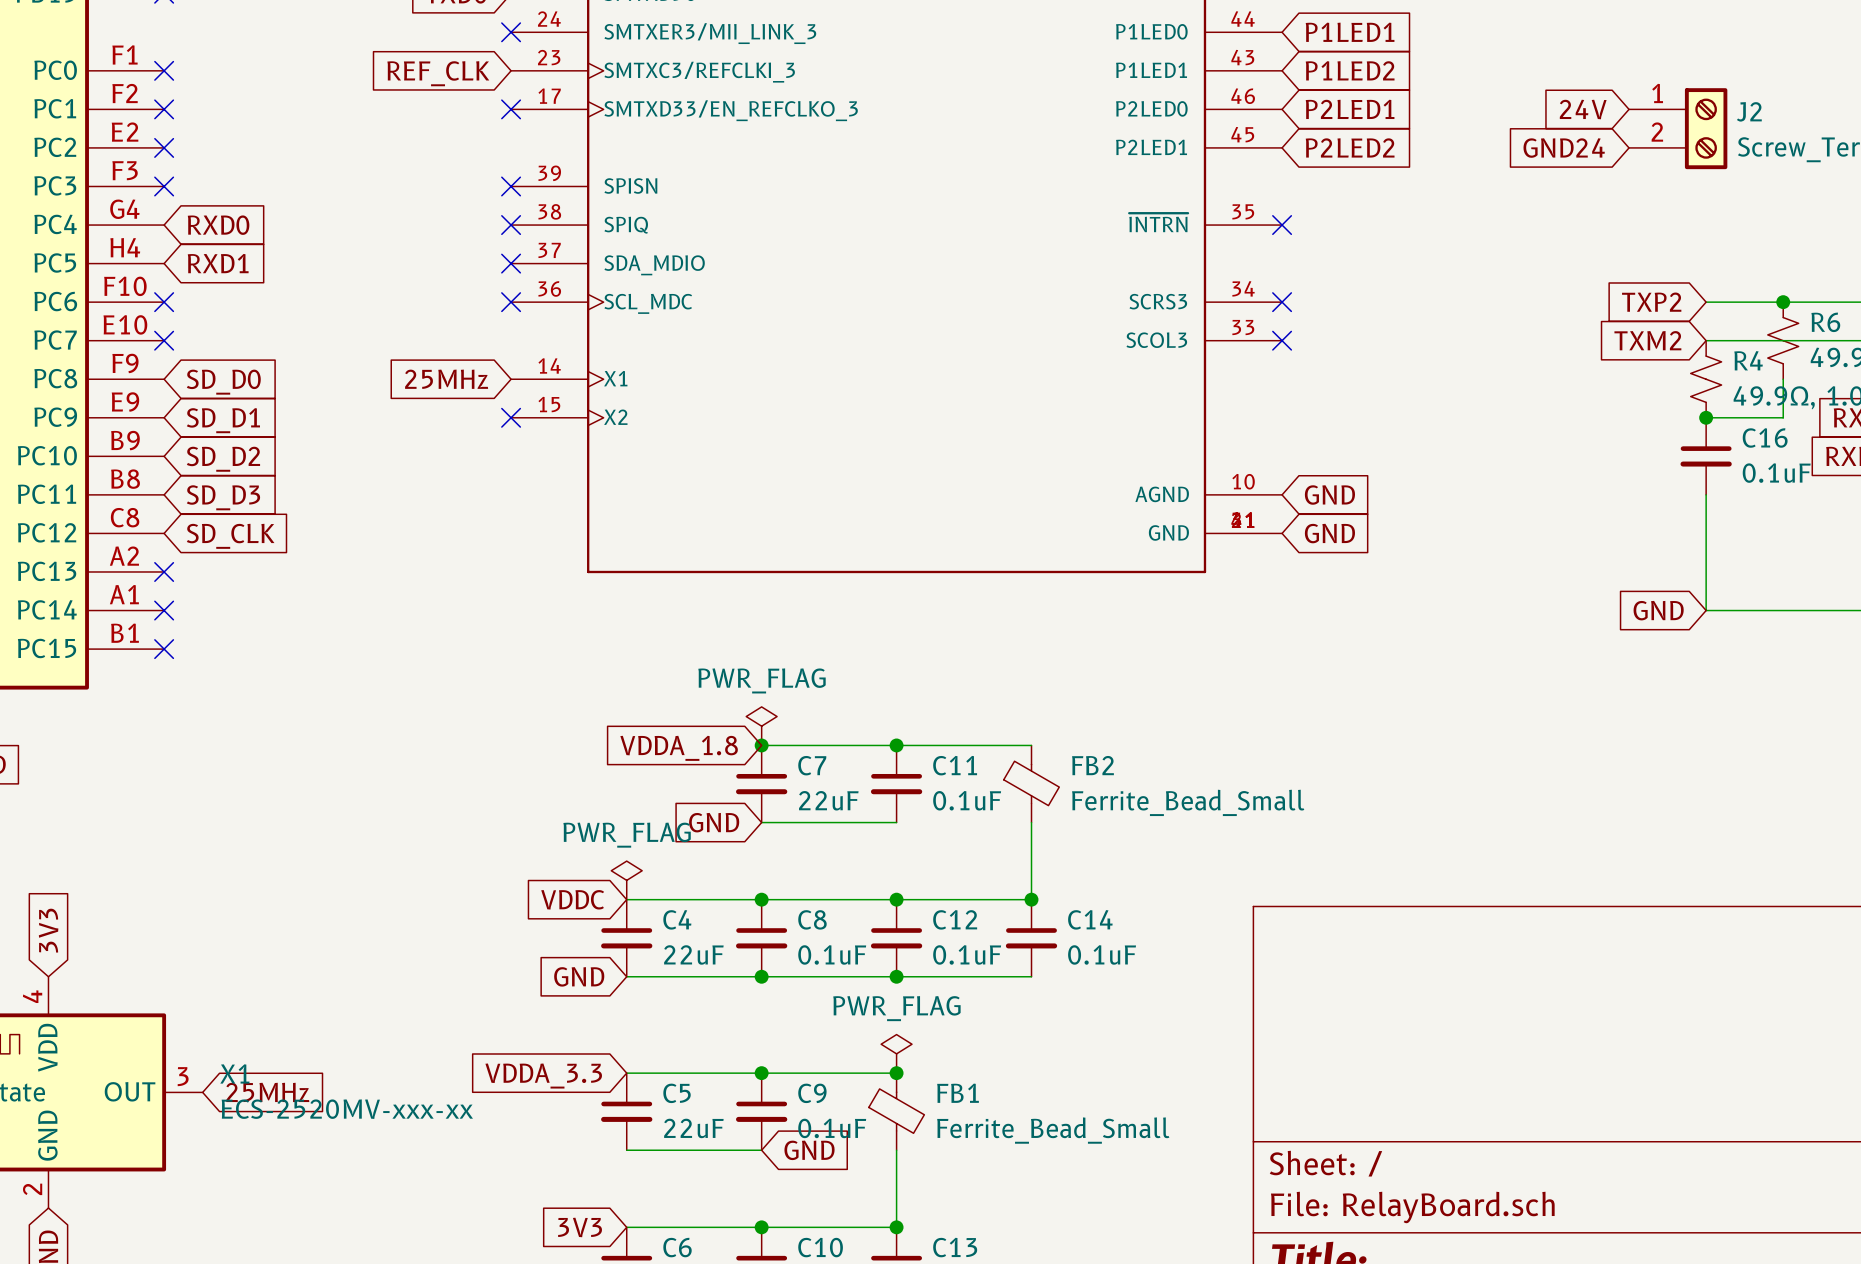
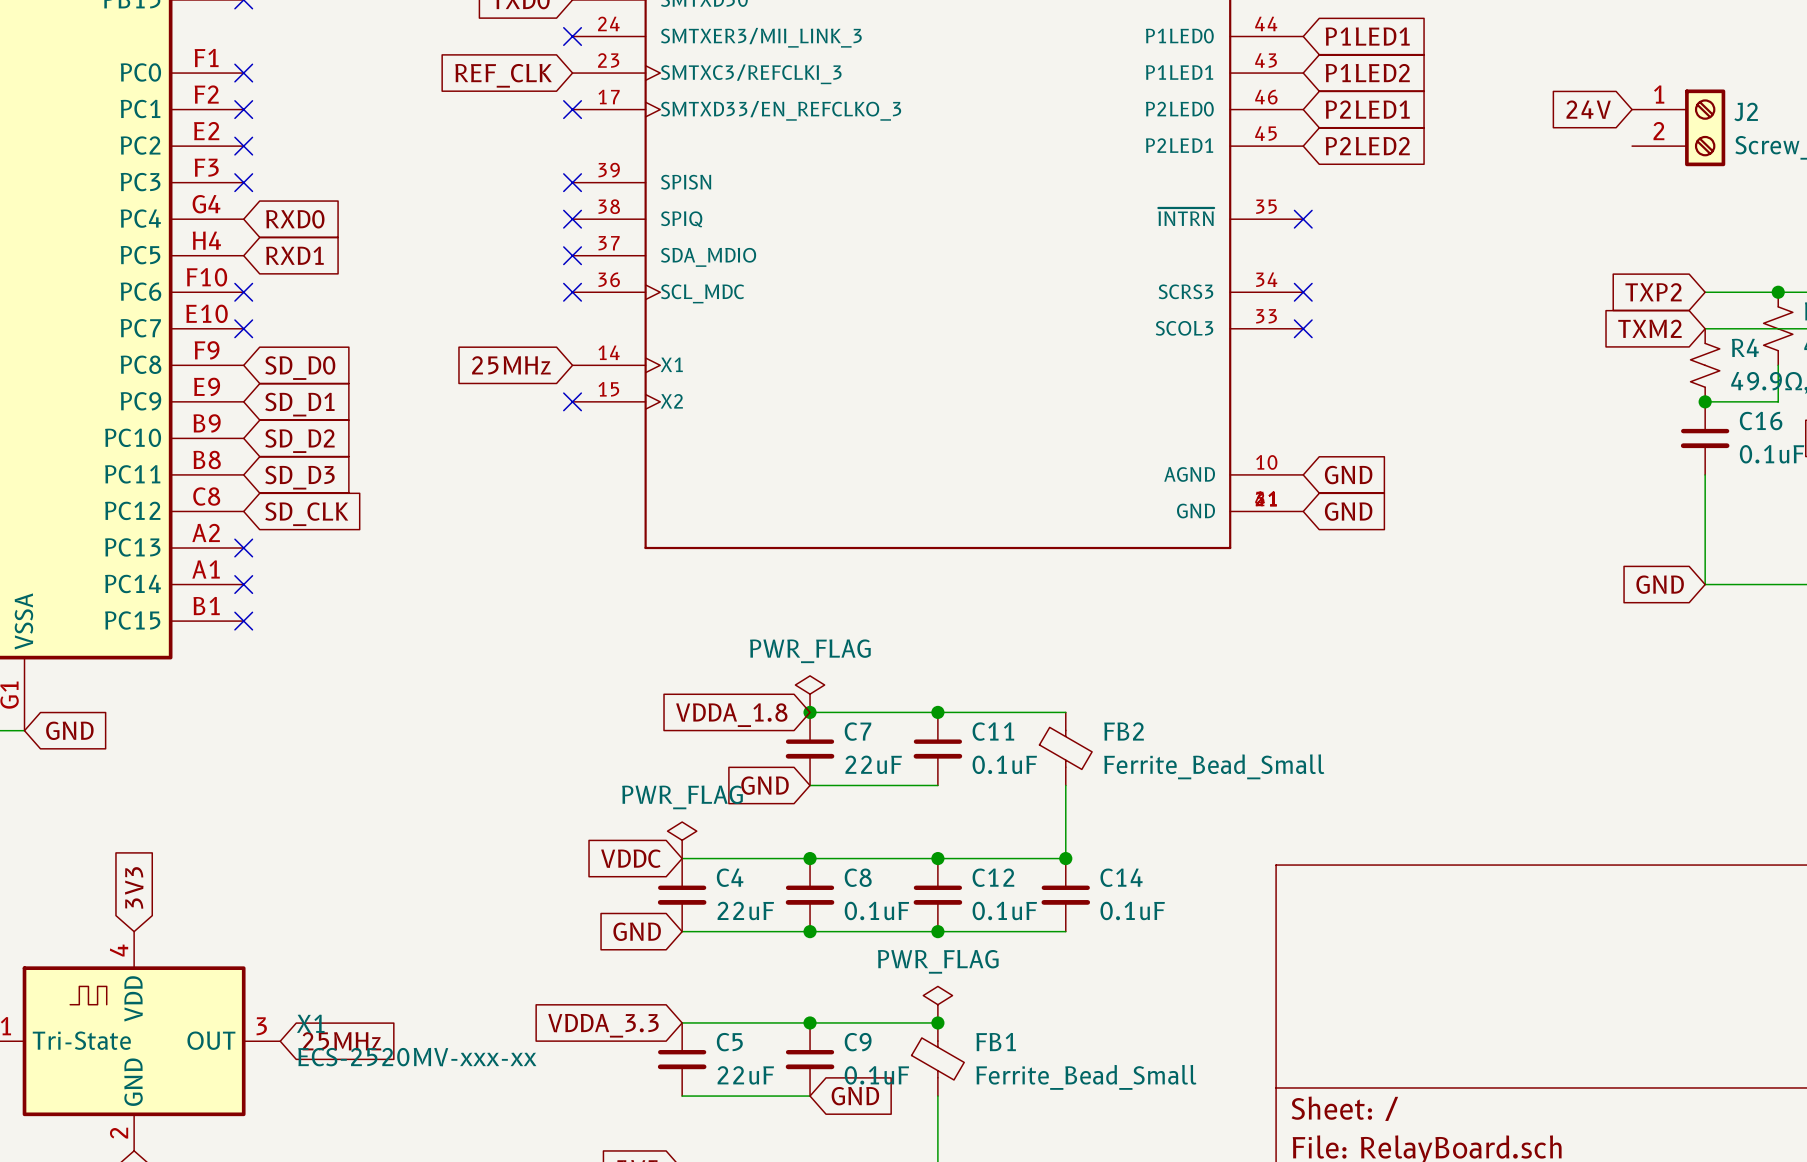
global label: GND24 (1564, 148) -> none

